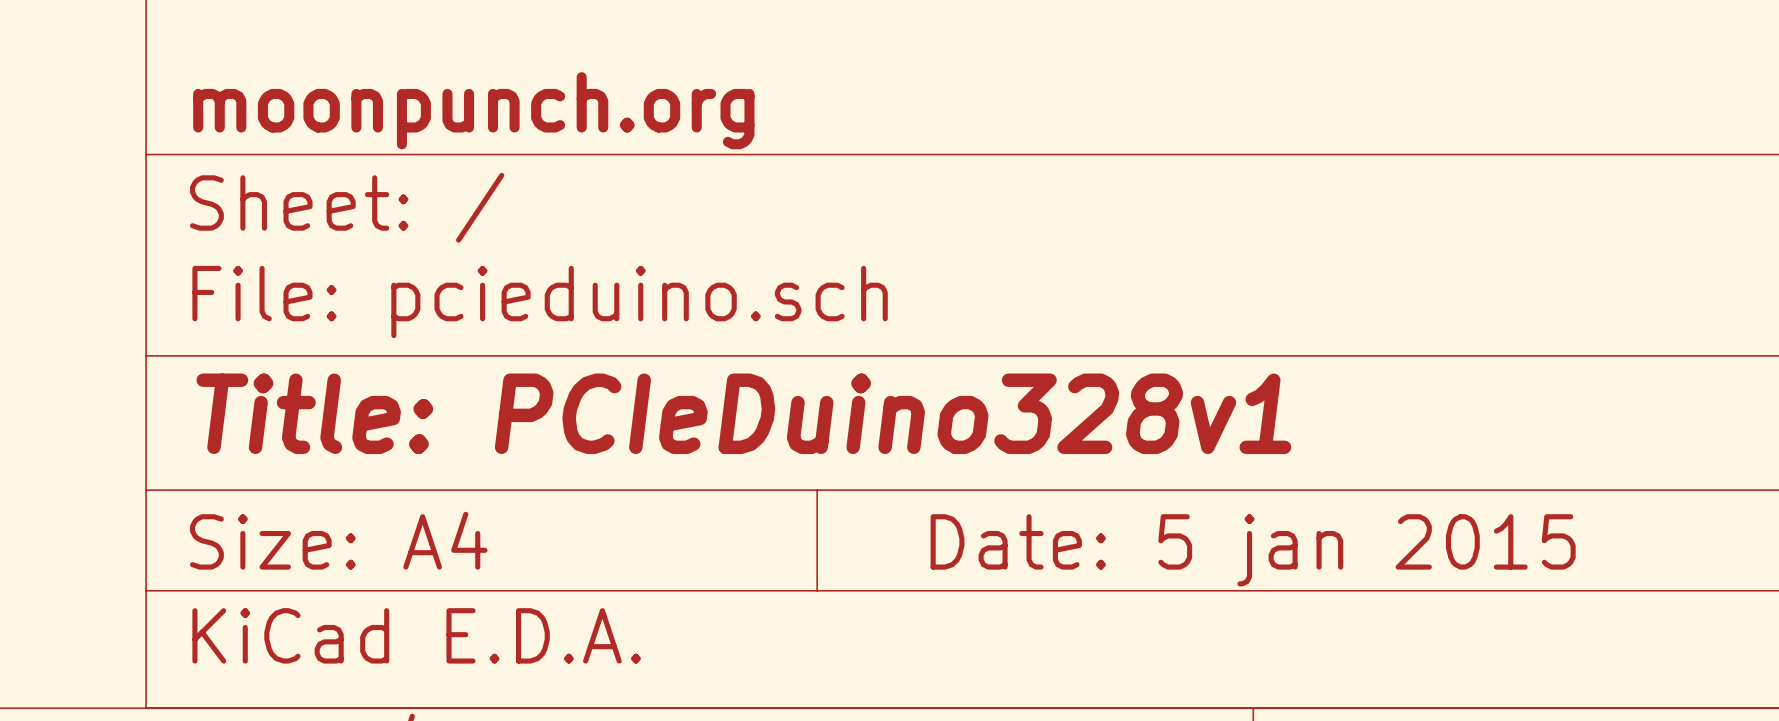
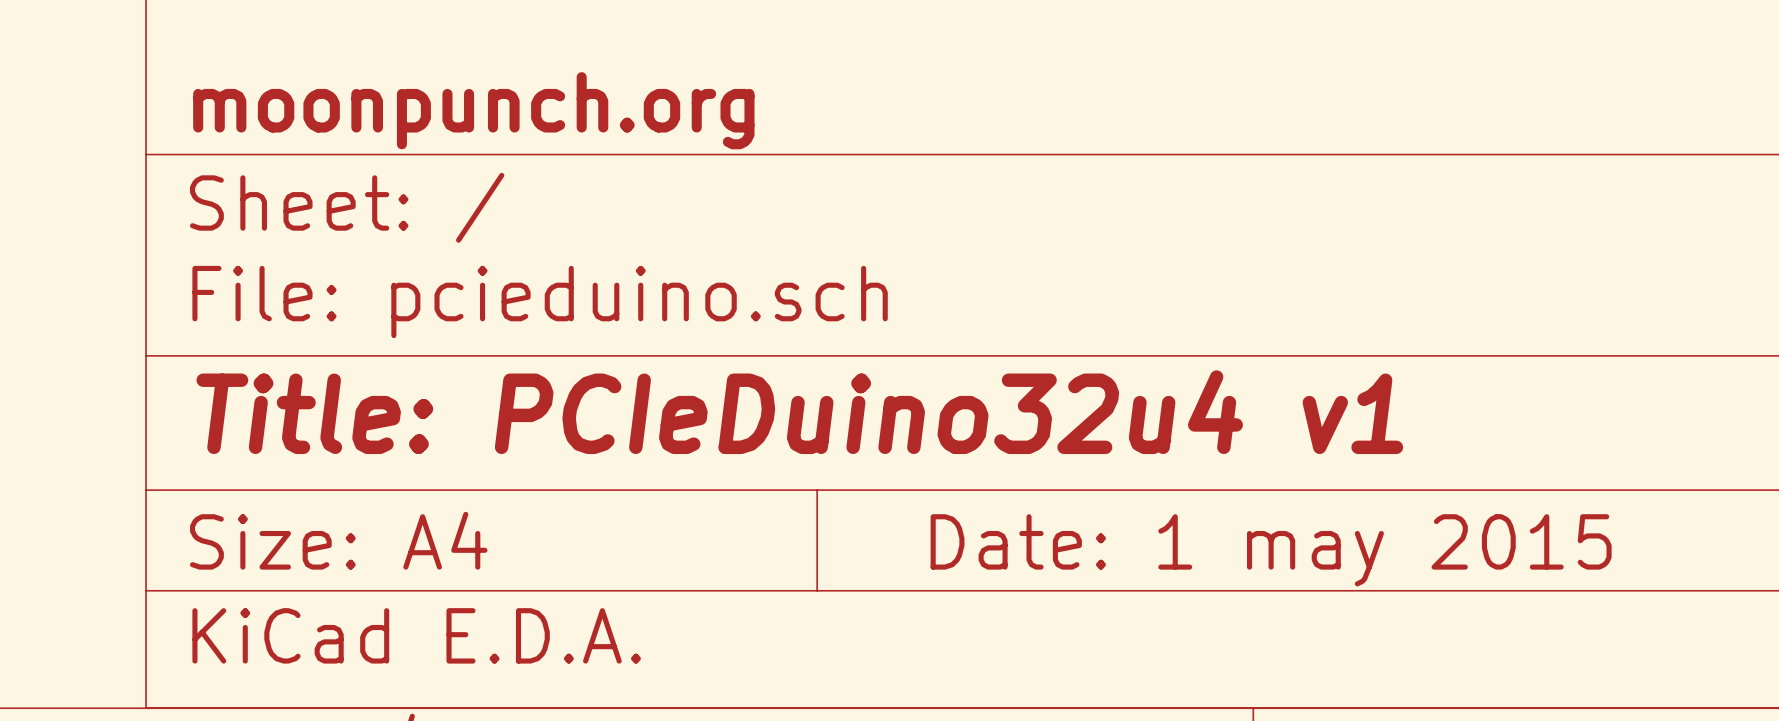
title block: Title: PCIeDuino328v1 (743, 413) -> Title: PCIeDuino32u4 v1 (799, 412)
title block: Date: 5 jan 2015 (1253, 550) -> Date: 1 may 2015 (1271, 550)

